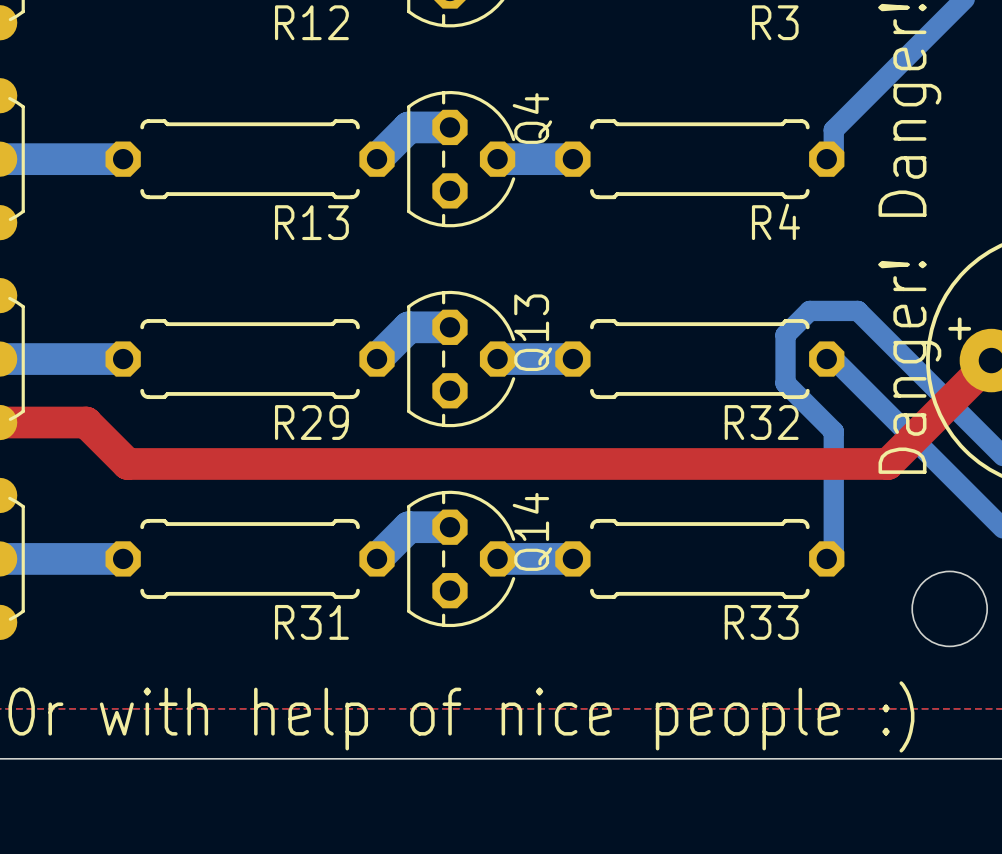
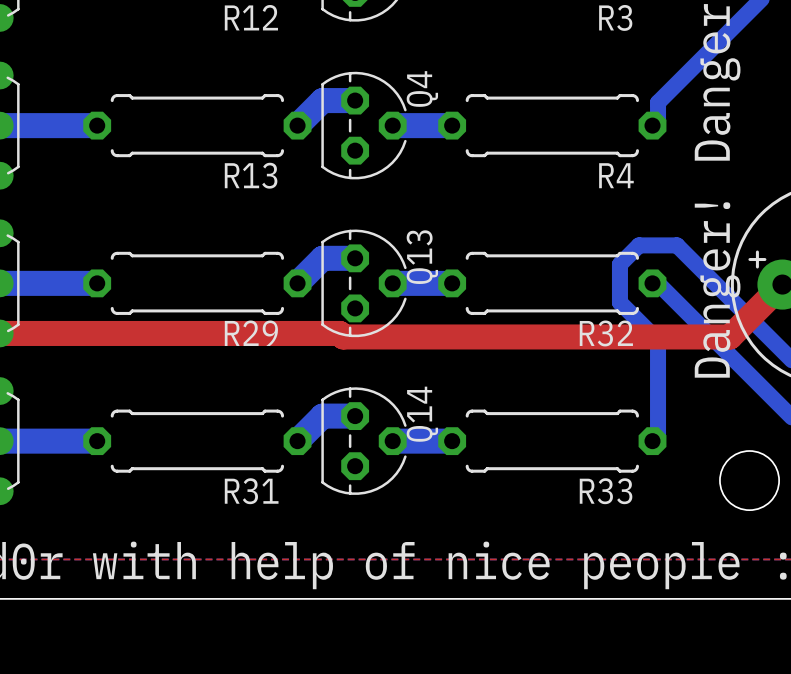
top track: (86, 422) (127, 463) (887, 463) (925, 426) -> (68, 333) (339, 333) (343, 336) (730, 336)

